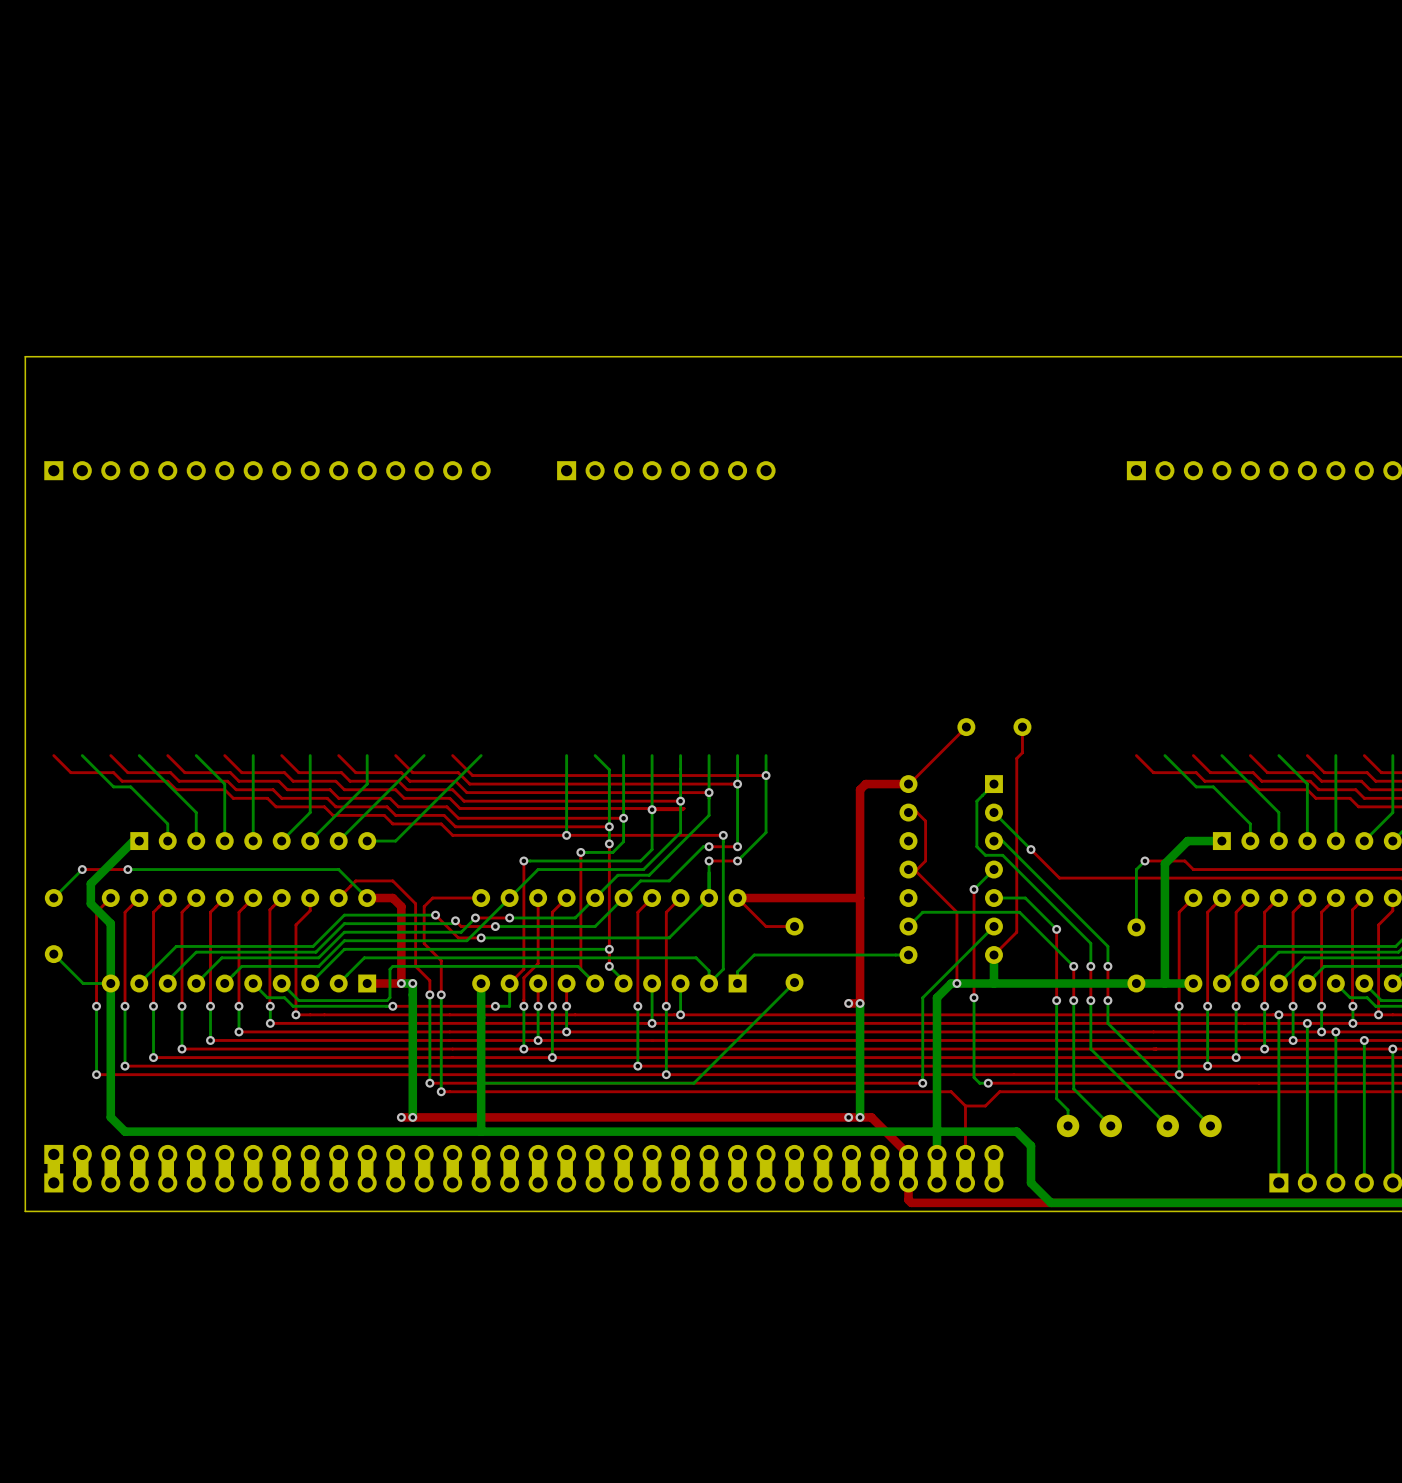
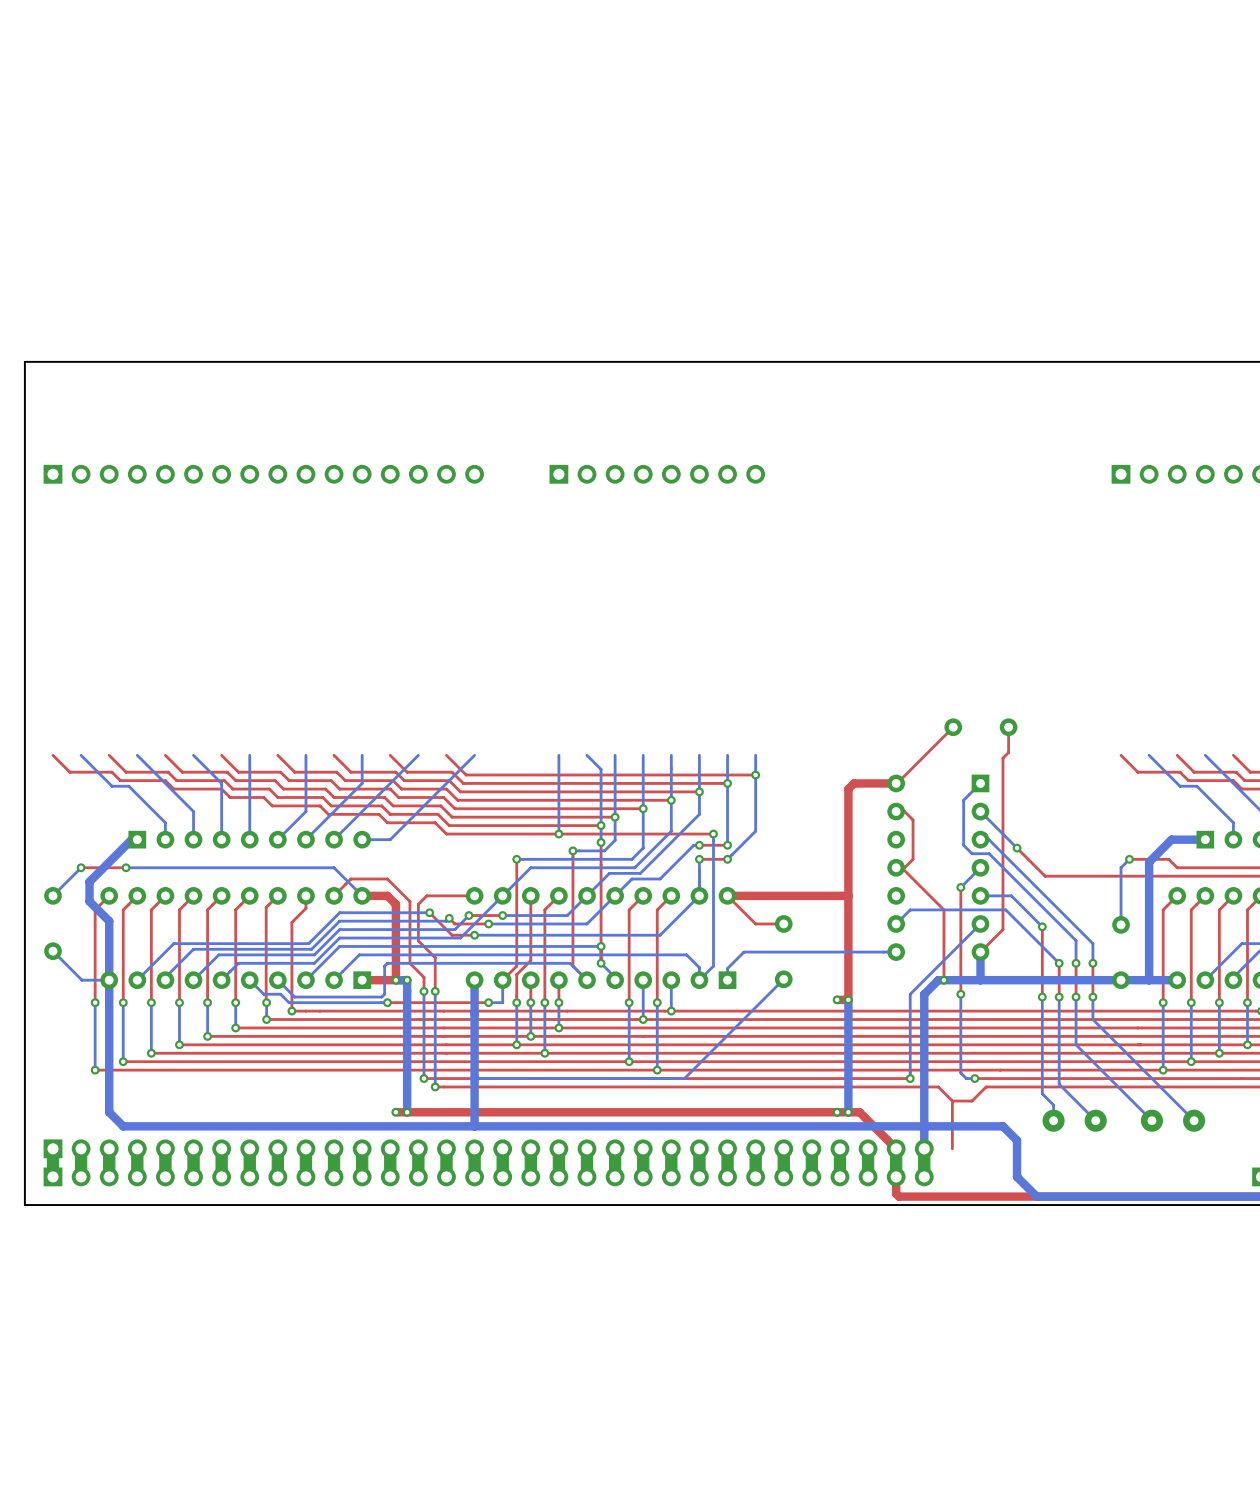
top track: (460, 808) (684, 808) (652, 809) -> (453, 807) (643, 808)
part: (523, 1168) -> none

